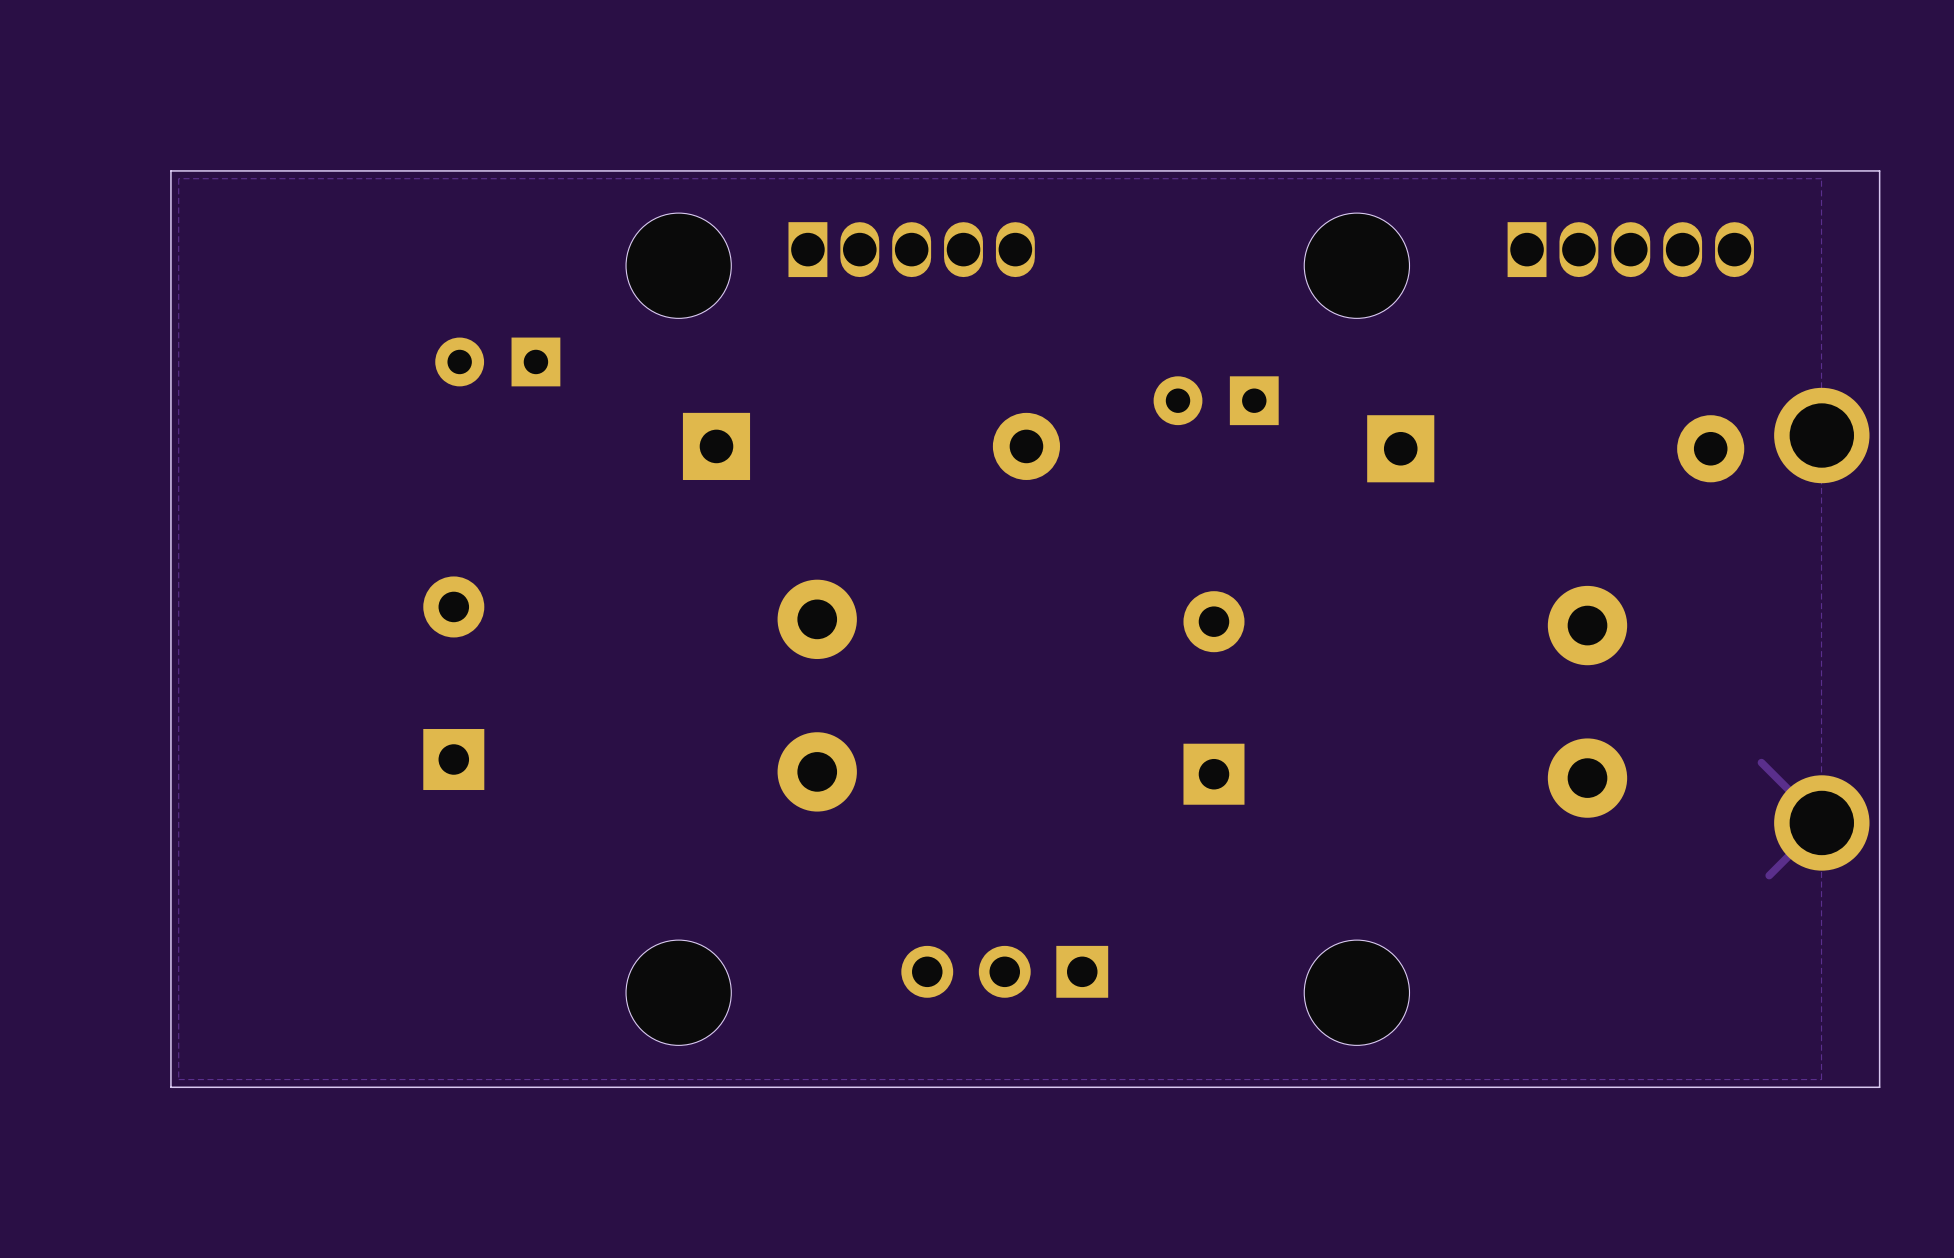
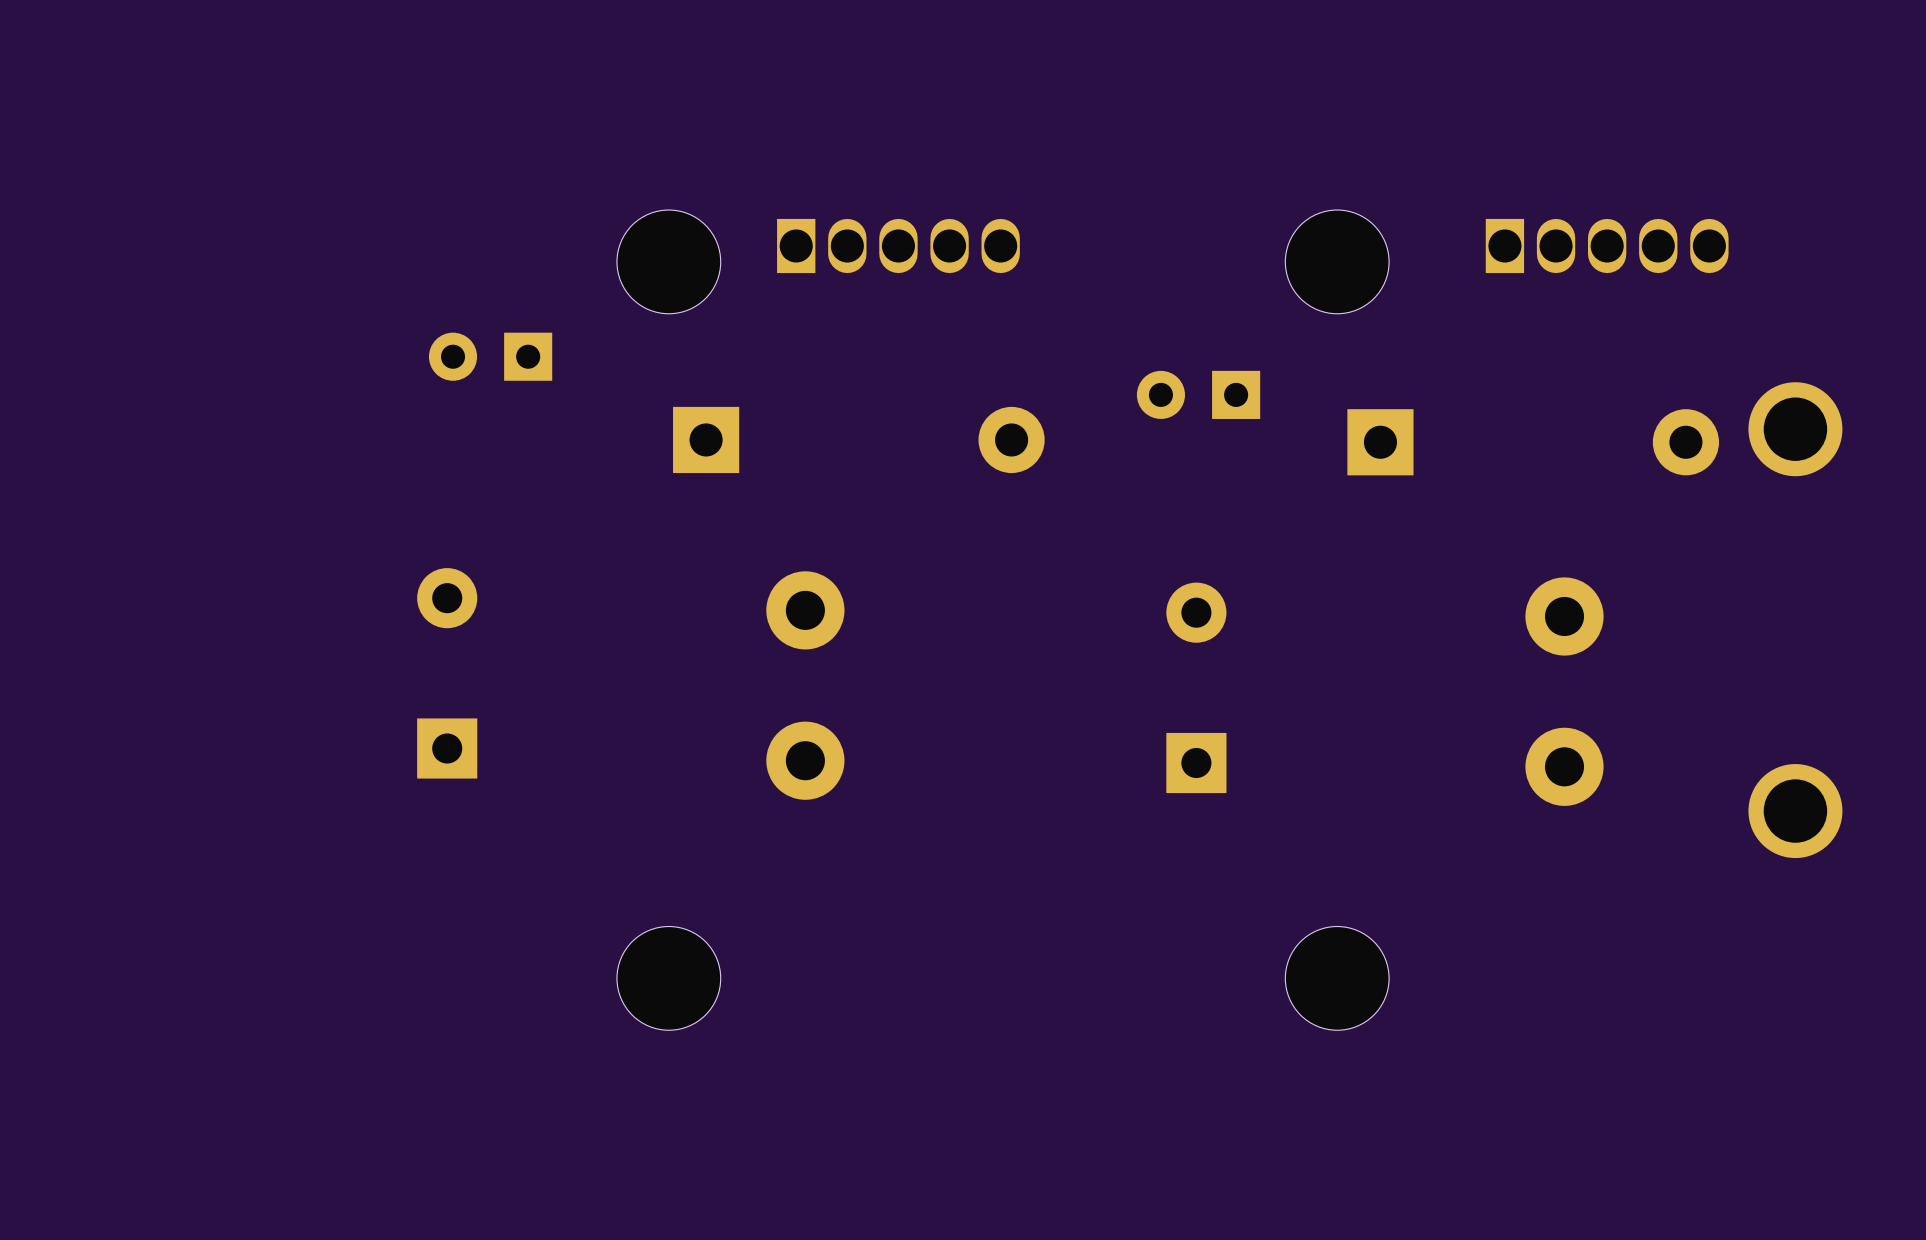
board edge: (1879, 170) (170, 170) (170, 1087) (1879, 1087) (1879, 170) -> none
zone outline: (1821, 178) (1821, 1079) (178, 1079) (178, 178) (1821, 178) -> none
track: (1761, 762) (1821, 822) (1769, 875) -> none
part: (1004, 971) -> none

